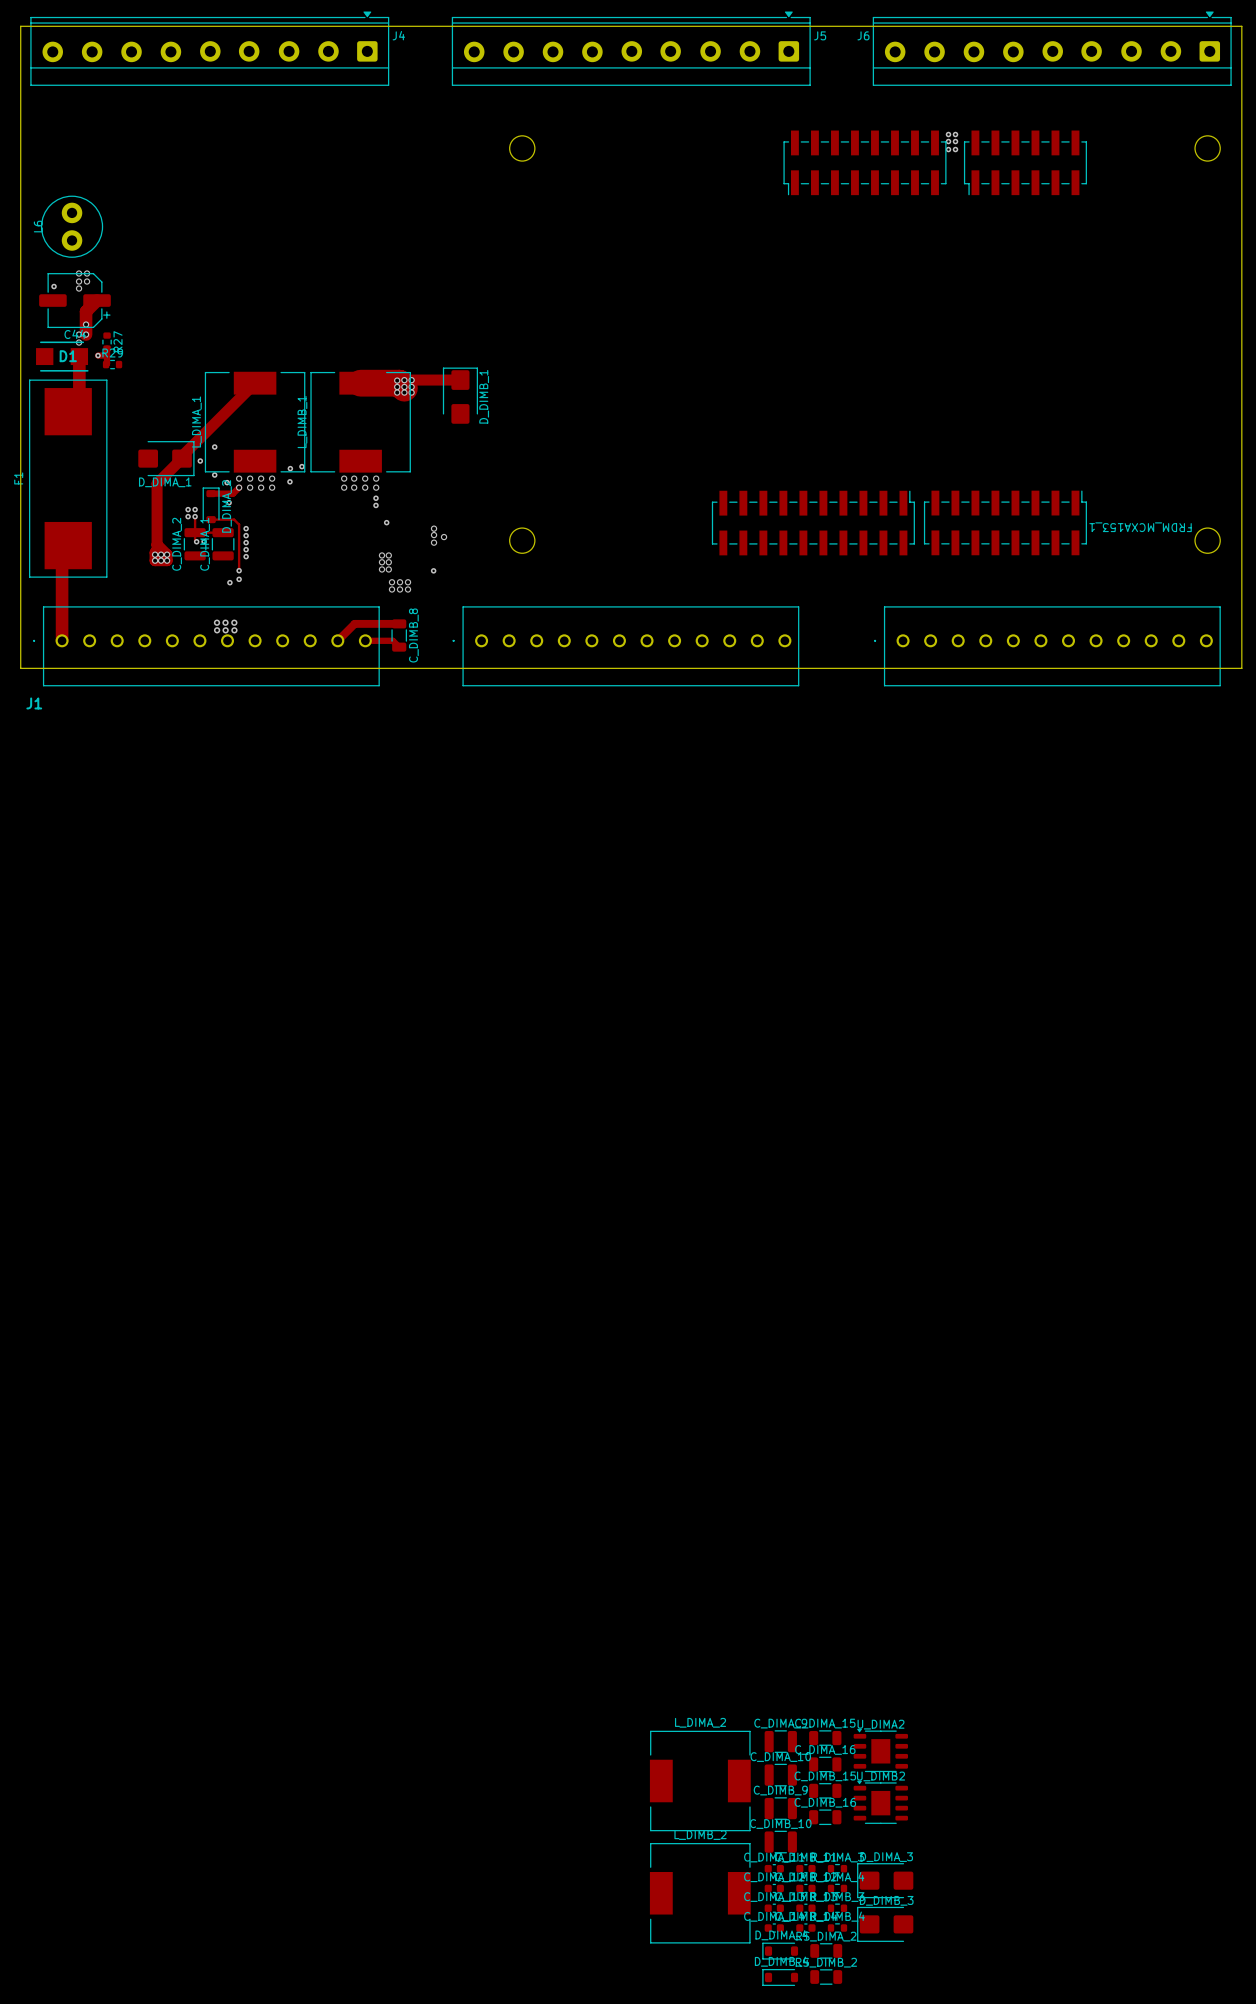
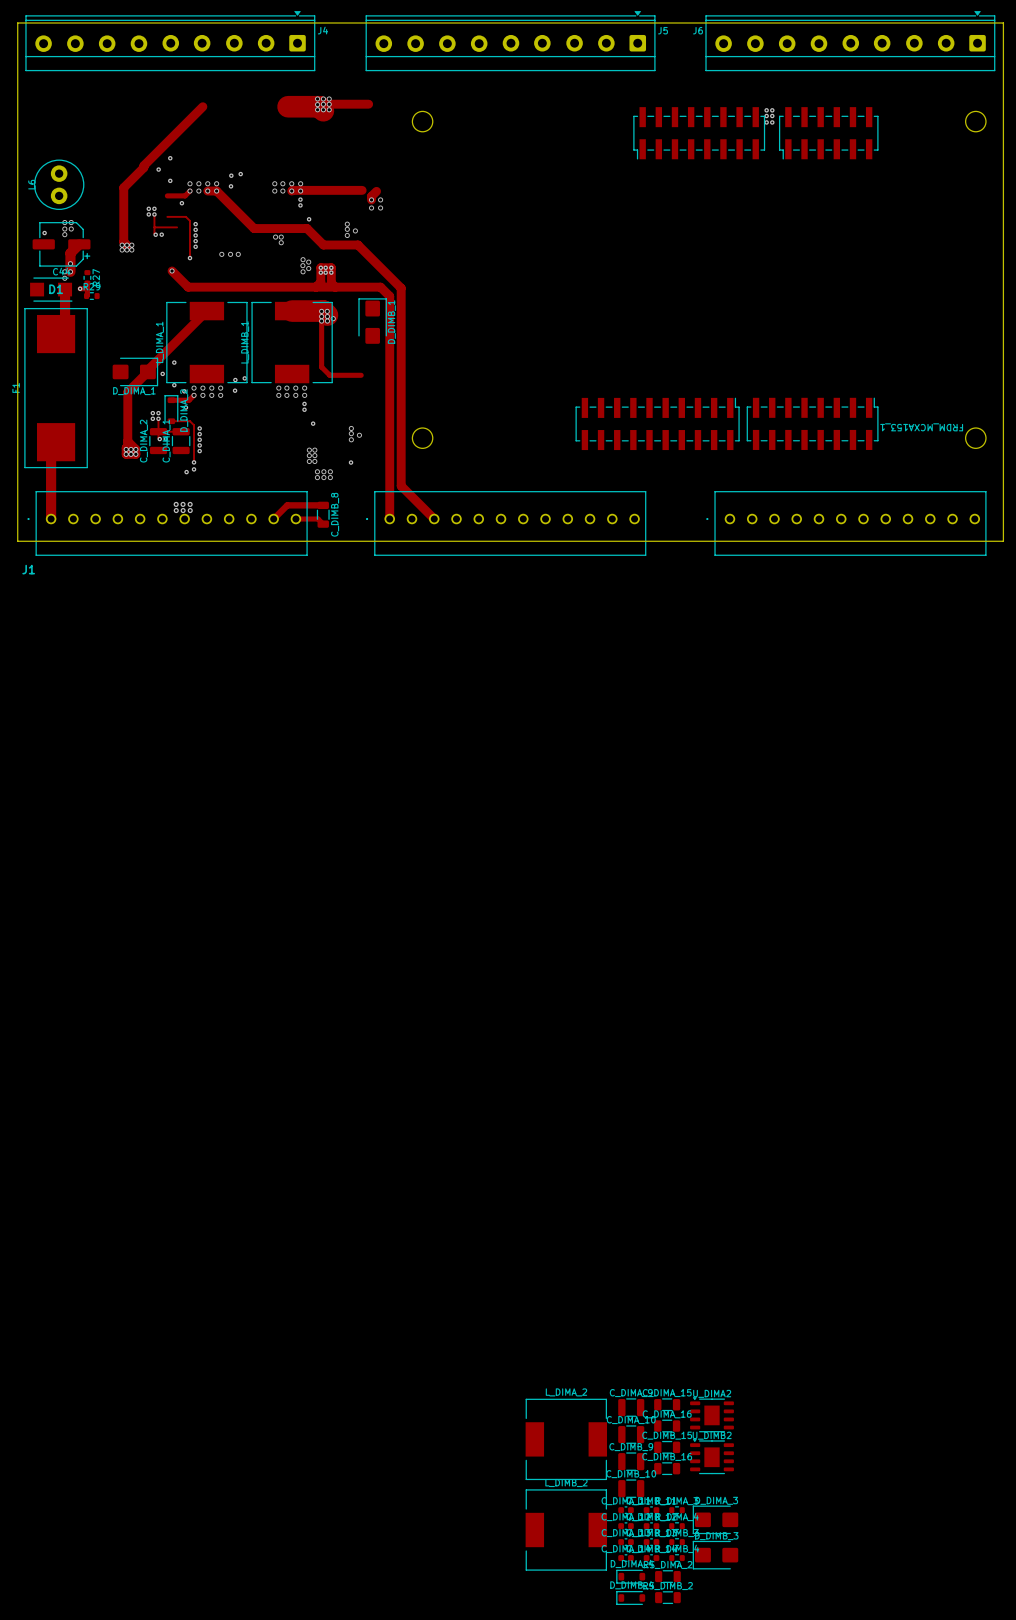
via: none -> (317, 98)
via: none -> (323, 98)
via: none -> (329, 98)
track: none -> (368, 104) (317, 104)
via: none -> (317, 104)
via: none -> (323, 104)
via: none -> (329, 104)
track: none -> (202, 106) (123, 187) (123, 241) (126, 245)
track: none -> (288, 106) (319, 106) (323, 110)
via: none -> (317, 109)
via: none -> (323, 109)
via: none -> (329, 109)
via: none -> (170, 158)
via: none -> (158, 169)
via: none -> (240, 174)
via: none -> (231, 175)
via: none -> (170, 180)
via: none -> (189, 183)
via: none -> (198, 183)
via: none -> (207, 183)
via: none -> (216, 183)
via: none -> (274, 183)
via: none -> (282, 183)
via: none -> (291, 183)
via: none -> (300, 183)
via: none -> (231, 186)
track: none -> (362, 190) (291, 191)
track: none -> (189, 191) (185, 195) (167, 195)
via: none -> (189, 191)
via: none -> (198, 191)
track: none -> (207, 191) (216, 191) (254, 228) (307, 228) (323, 245) (357, 245) (401, 288) (401, 485) (434, 519)
via: none -> (207, 191)
via: none -> (216, 191)
via: none -> (274, 191)
via: none -> (282, 191)
via: none -> (291, 191)
via: none -> (300, 191)
track: none -> (376, 191) (371, 196) (371, 199)
via: none -> (300, 199)
via: none -> (371, 199)
via: none -> (380, 199)
via: none -> (181, 203)
via: none -> (300, 205)
via: none -> (371, 208)
via: none -> (380, 208)
via: none -> (148, 208)
via: none -> (154, 208)
via: none -> (148, 214)
track: none -> (154, 214) (155, 234)
via: none -> (154, 214)
track: none -> (167, 216) (185, 216) (189, 220) (189, 258)
via: none -> (309, 219)
via: none -> (195, 224)
via: none -> (347, 224)
track: none -> (154, 227) (177, 227)
via: none -> (347, 229)
via: none -> (195, 229)
via: none -> (355, 230)
via: none -> (155, 234)
via: none -> (161, 234)
via: none -> (195, 235)
via: none -> (347, 235)
via: none -> (275, 237)
via: none -> (281, 237)
via: none -> (195, 241)
via: none -> (281, 242)
via: none -> (122, 245)
via: none -> (126, 245)
via: none -> (131, 245)
via: none -> (195, 246)
via: none -> (122, 250)
via: none -> (126, 250)
via: none -> (131, 250)
via: none -> (221, 254)
via: none -> (230, 254)
via: none -> (238, 254)
via: none -> (189, 258)
via: none -> (303, 259)
via: none -> (308, 262)
via: none -> (302, 265)
via: none -> (320, 267)
via: none -> (325, 267)
via: none -> (331, 267)
via: none -> (308, 268)
track: none -> (172, 271) (188, 287) (380, 287) (389, 296) (388, 518)
via: none -> (172, 271)
via: none -> (303, 271)
via: none -> (320, 272)
via: none -> (325, 272)
via: none -> (331, 272)
track: none -> (315, 287) (320, 282) (320, 267) (331, 267) (331, 283) (335, 287)
via: (397, 380) -> none
via: (404, 380) -> none
via: (411, 380) -> none
track: (460, 380) (397, 380) -> none
track: none -> (321, 311) (321, 367) (329, 375) (361, 375)
via: none -> (321, 311)
via: none -> (327, 311)
via: (397, 386) -> none
via: (404, 386) -> none
via: (411, 386) -> none
via: none -> (321, 316)
via: none -> (327, 316)
via: (397, 392) -> none
via: (404, 392) -> none
via: none -> (321, 321)
via: none -> (327, 321)

